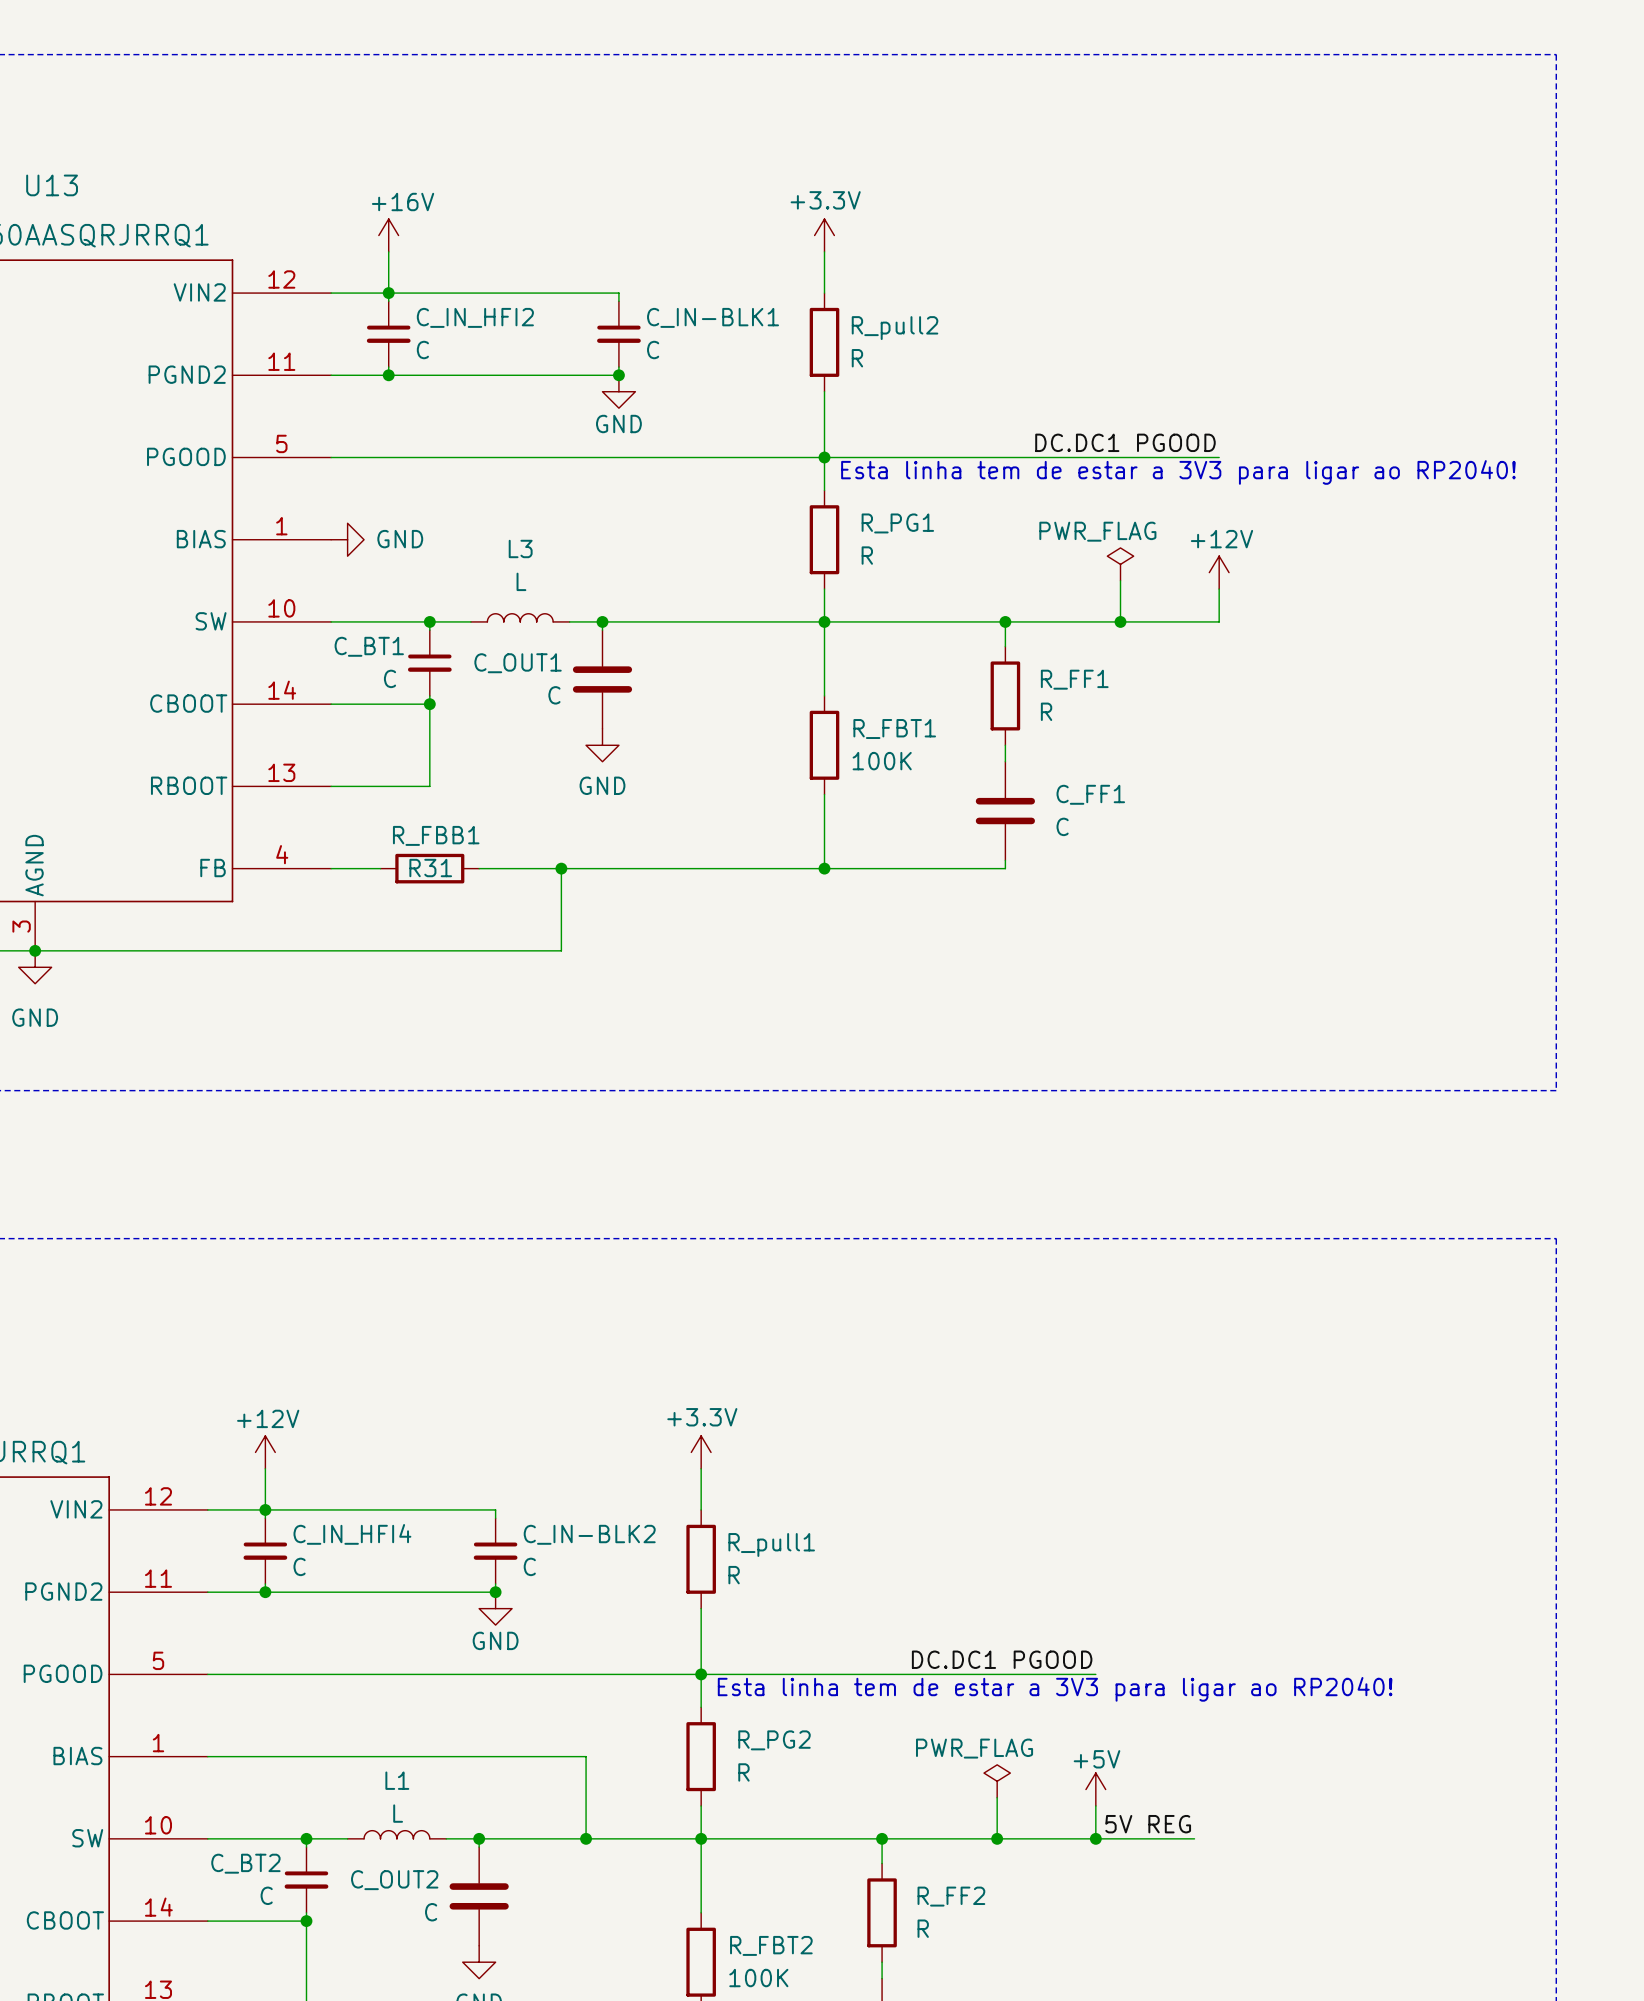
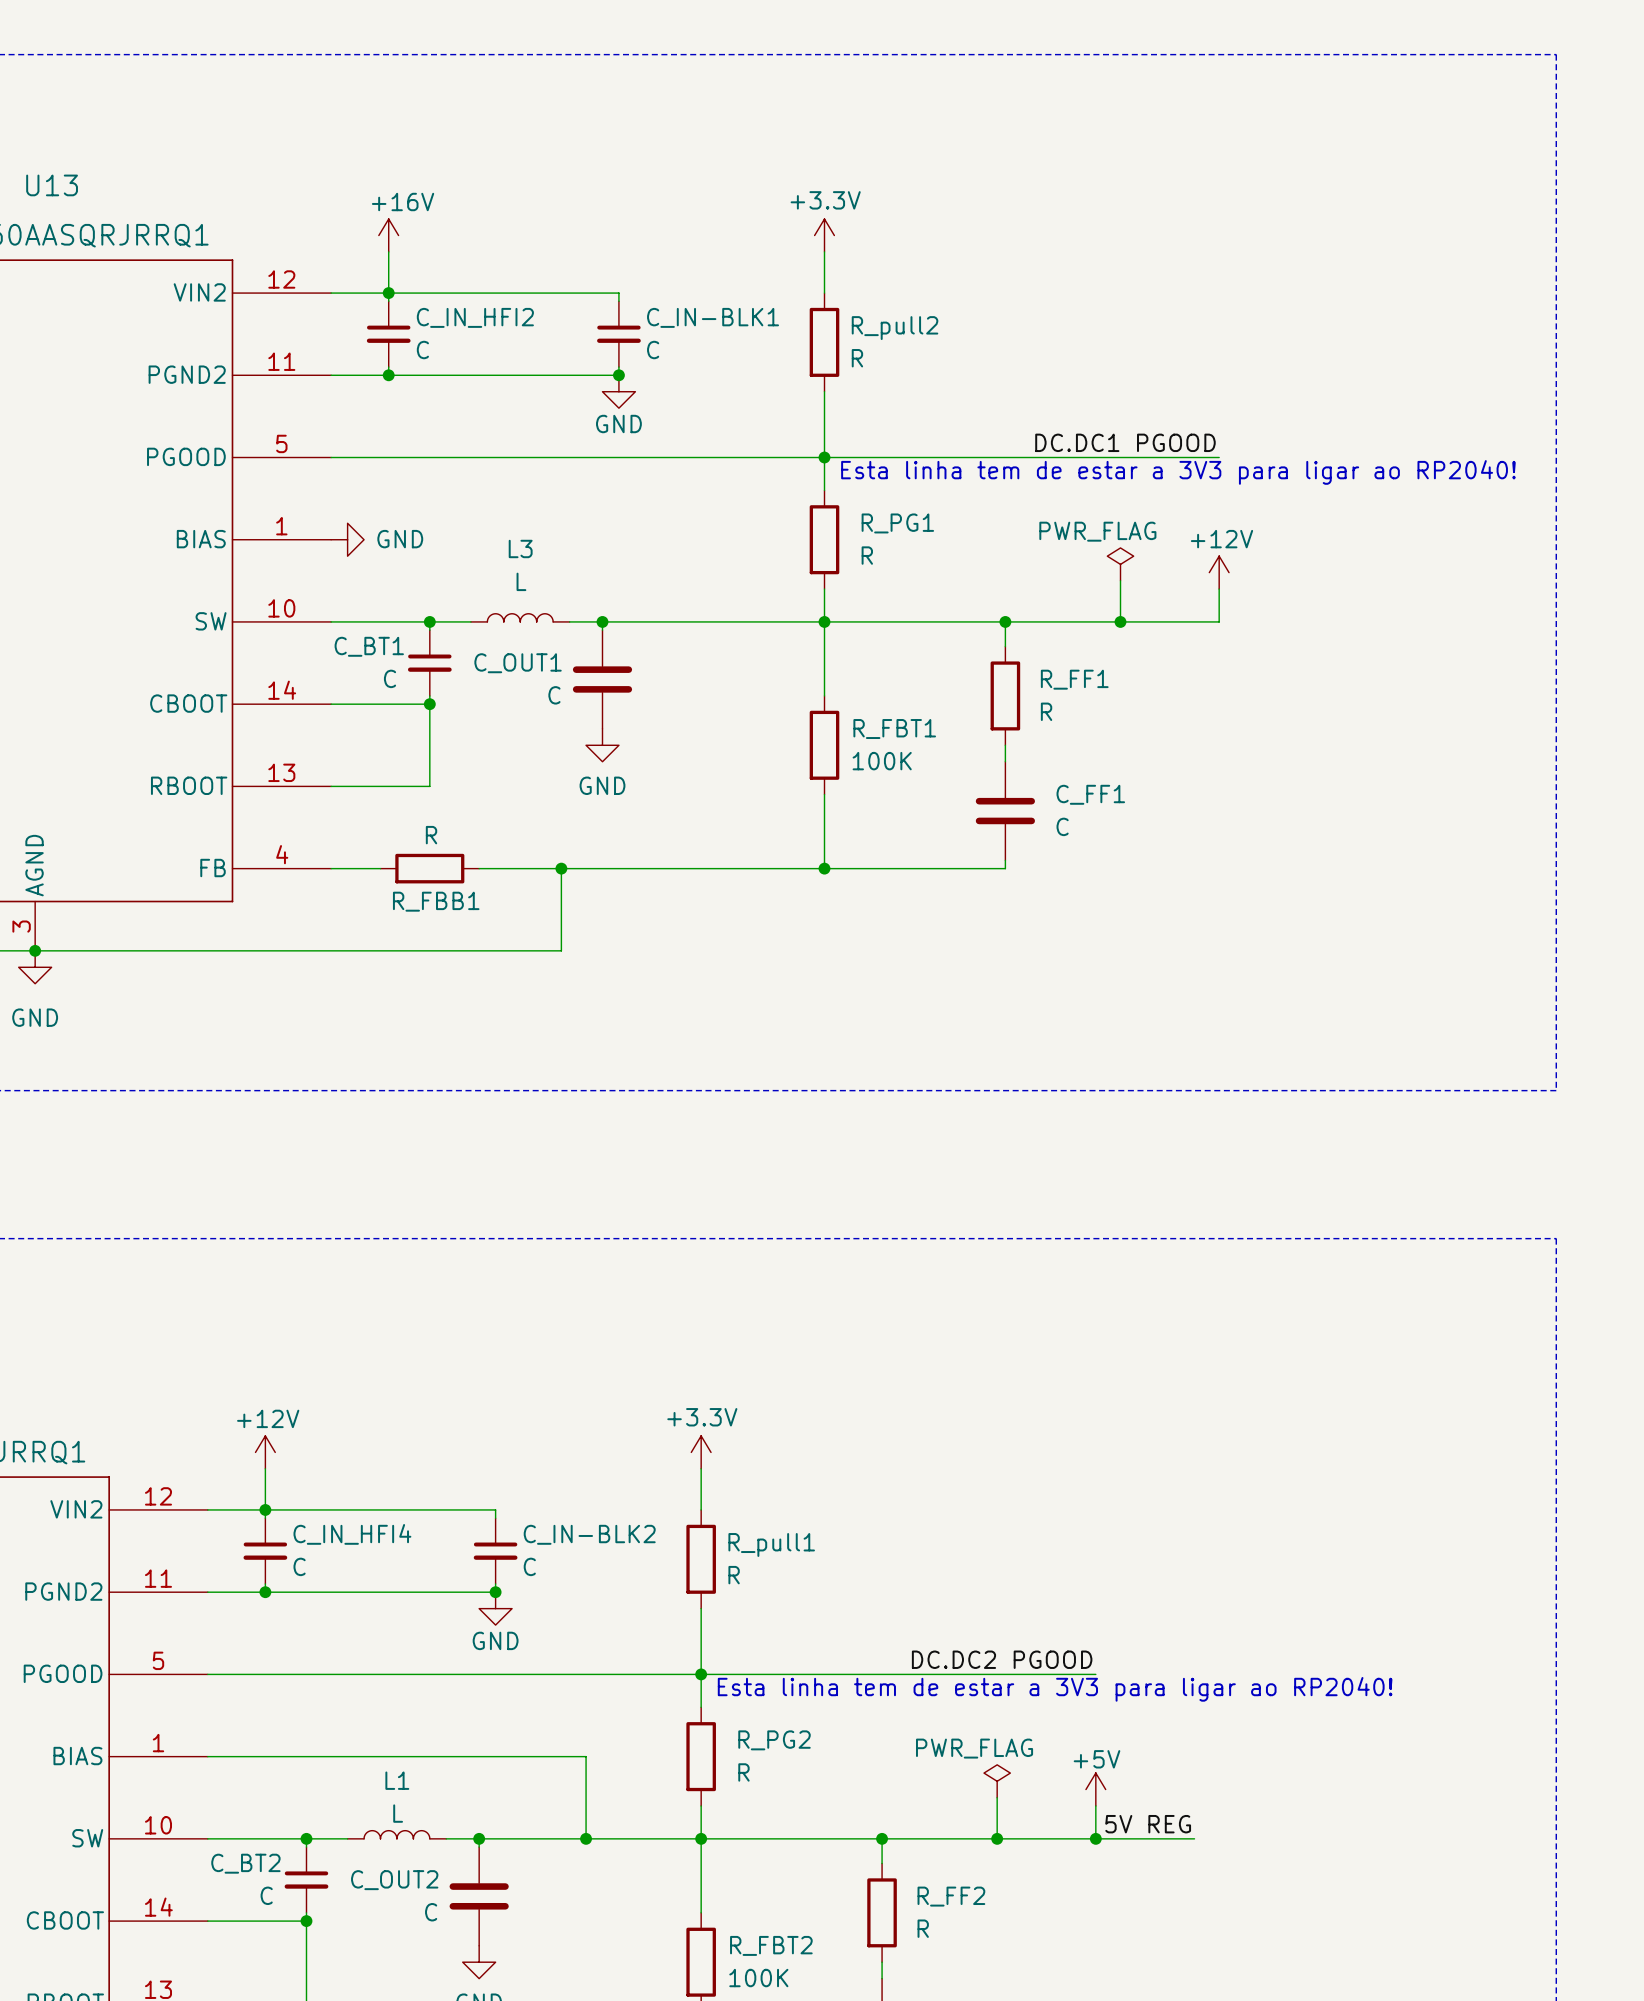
R31 value: R_FBB1 (436, 835) -> R (431, 835)
R31 name: R31 (430, 868) -> R_FBB1 (436, 901)
label: DC.DC1 PGOOD (1002, 1659) -> DC.DC2 PGOOD (1002, 1659)

